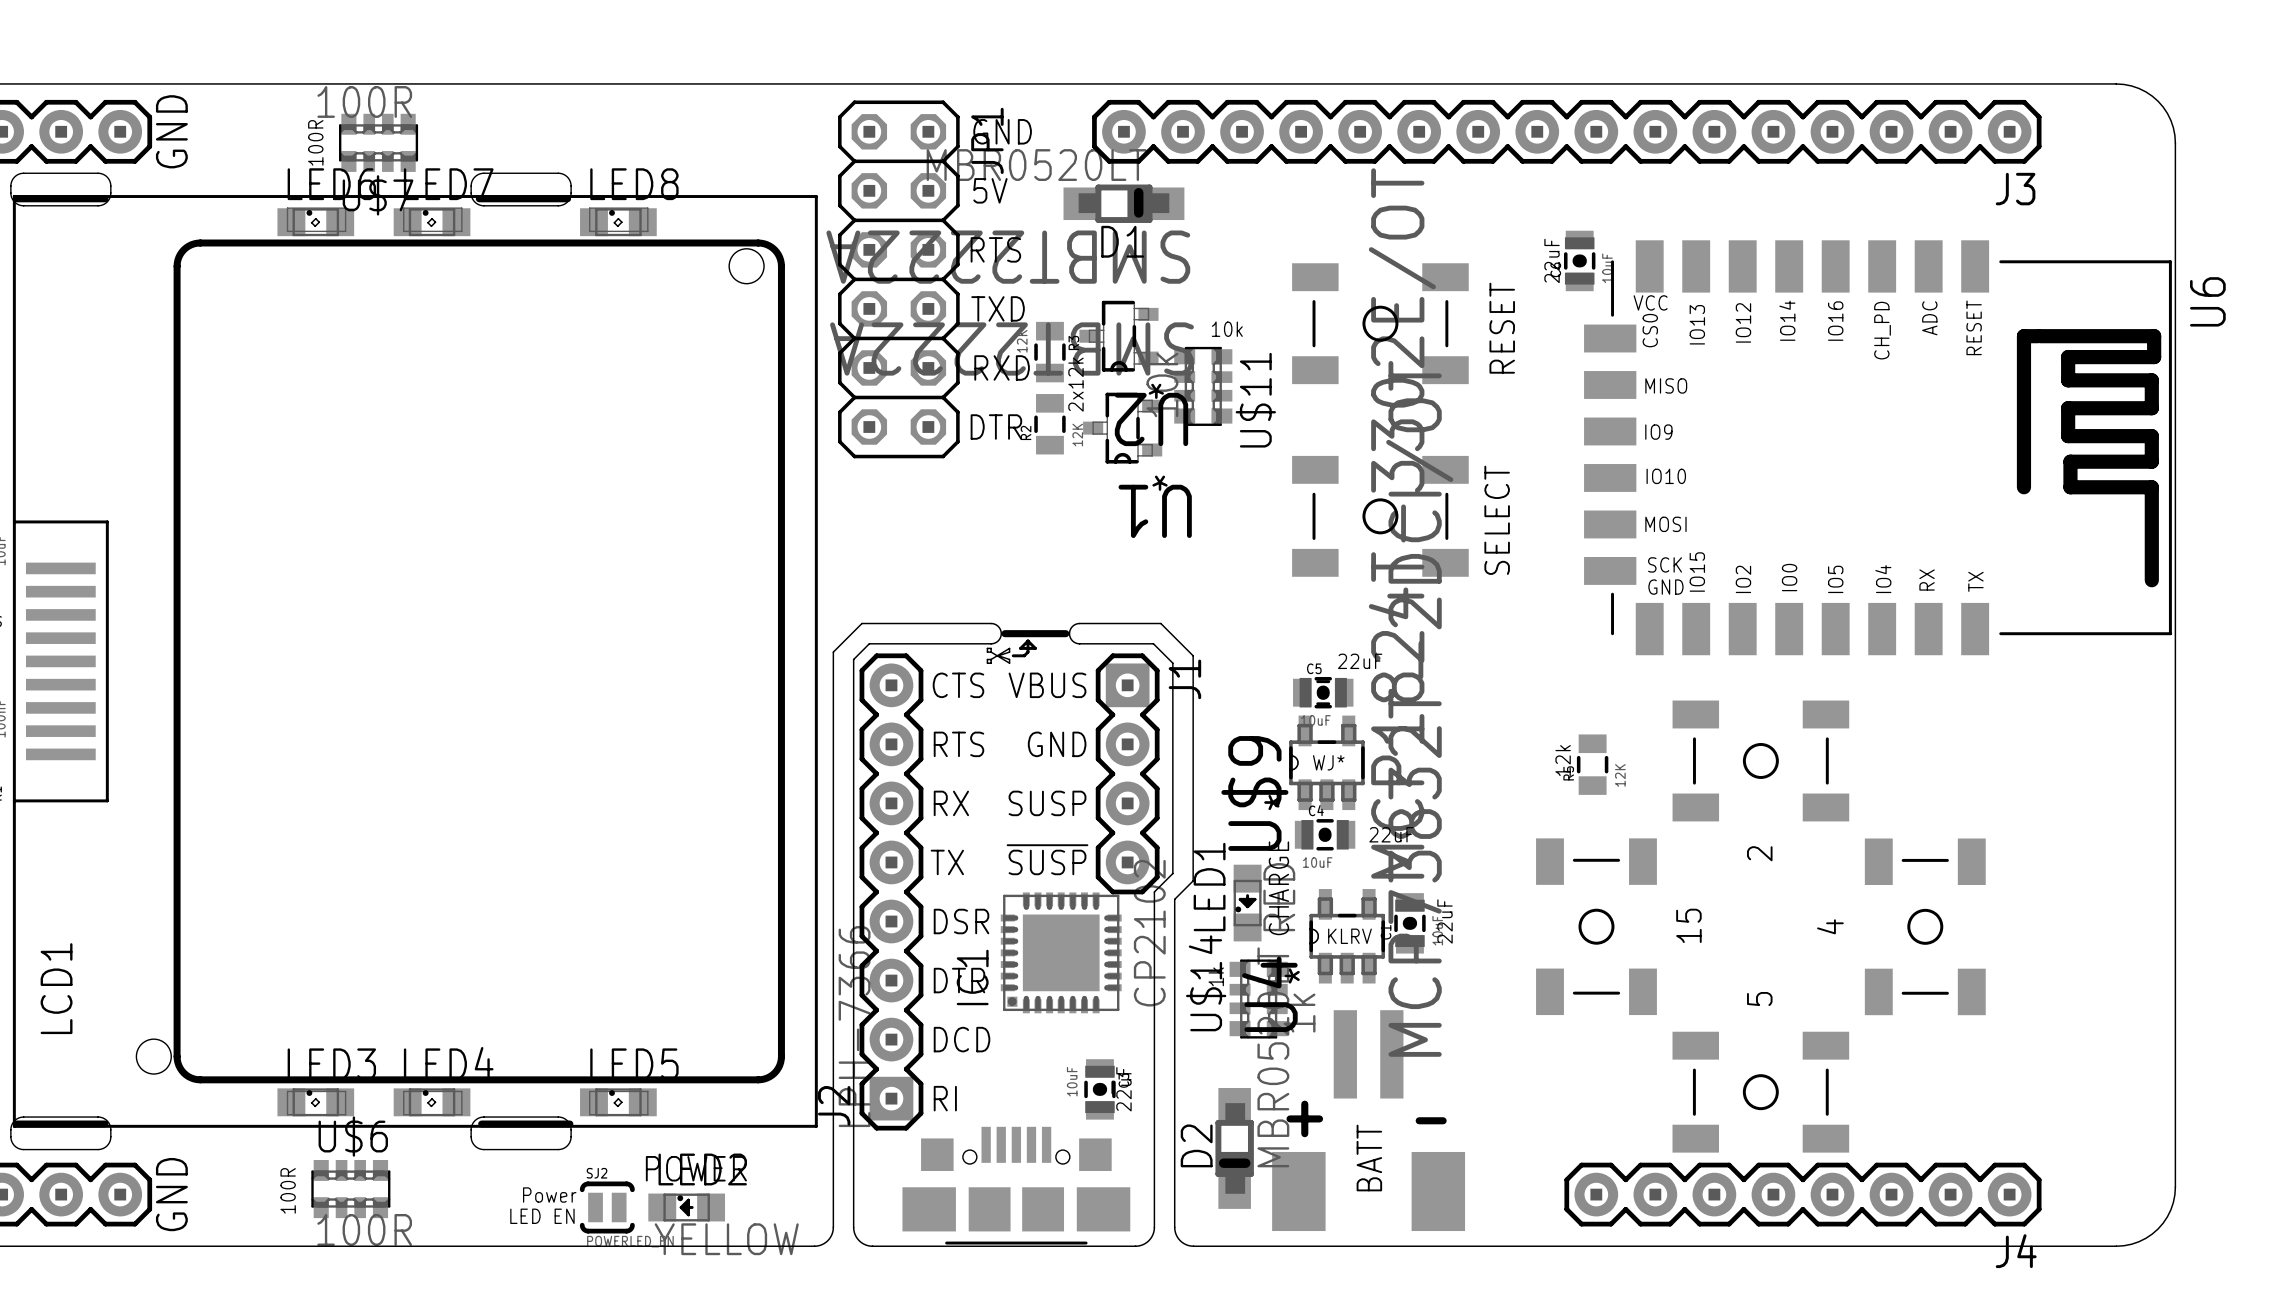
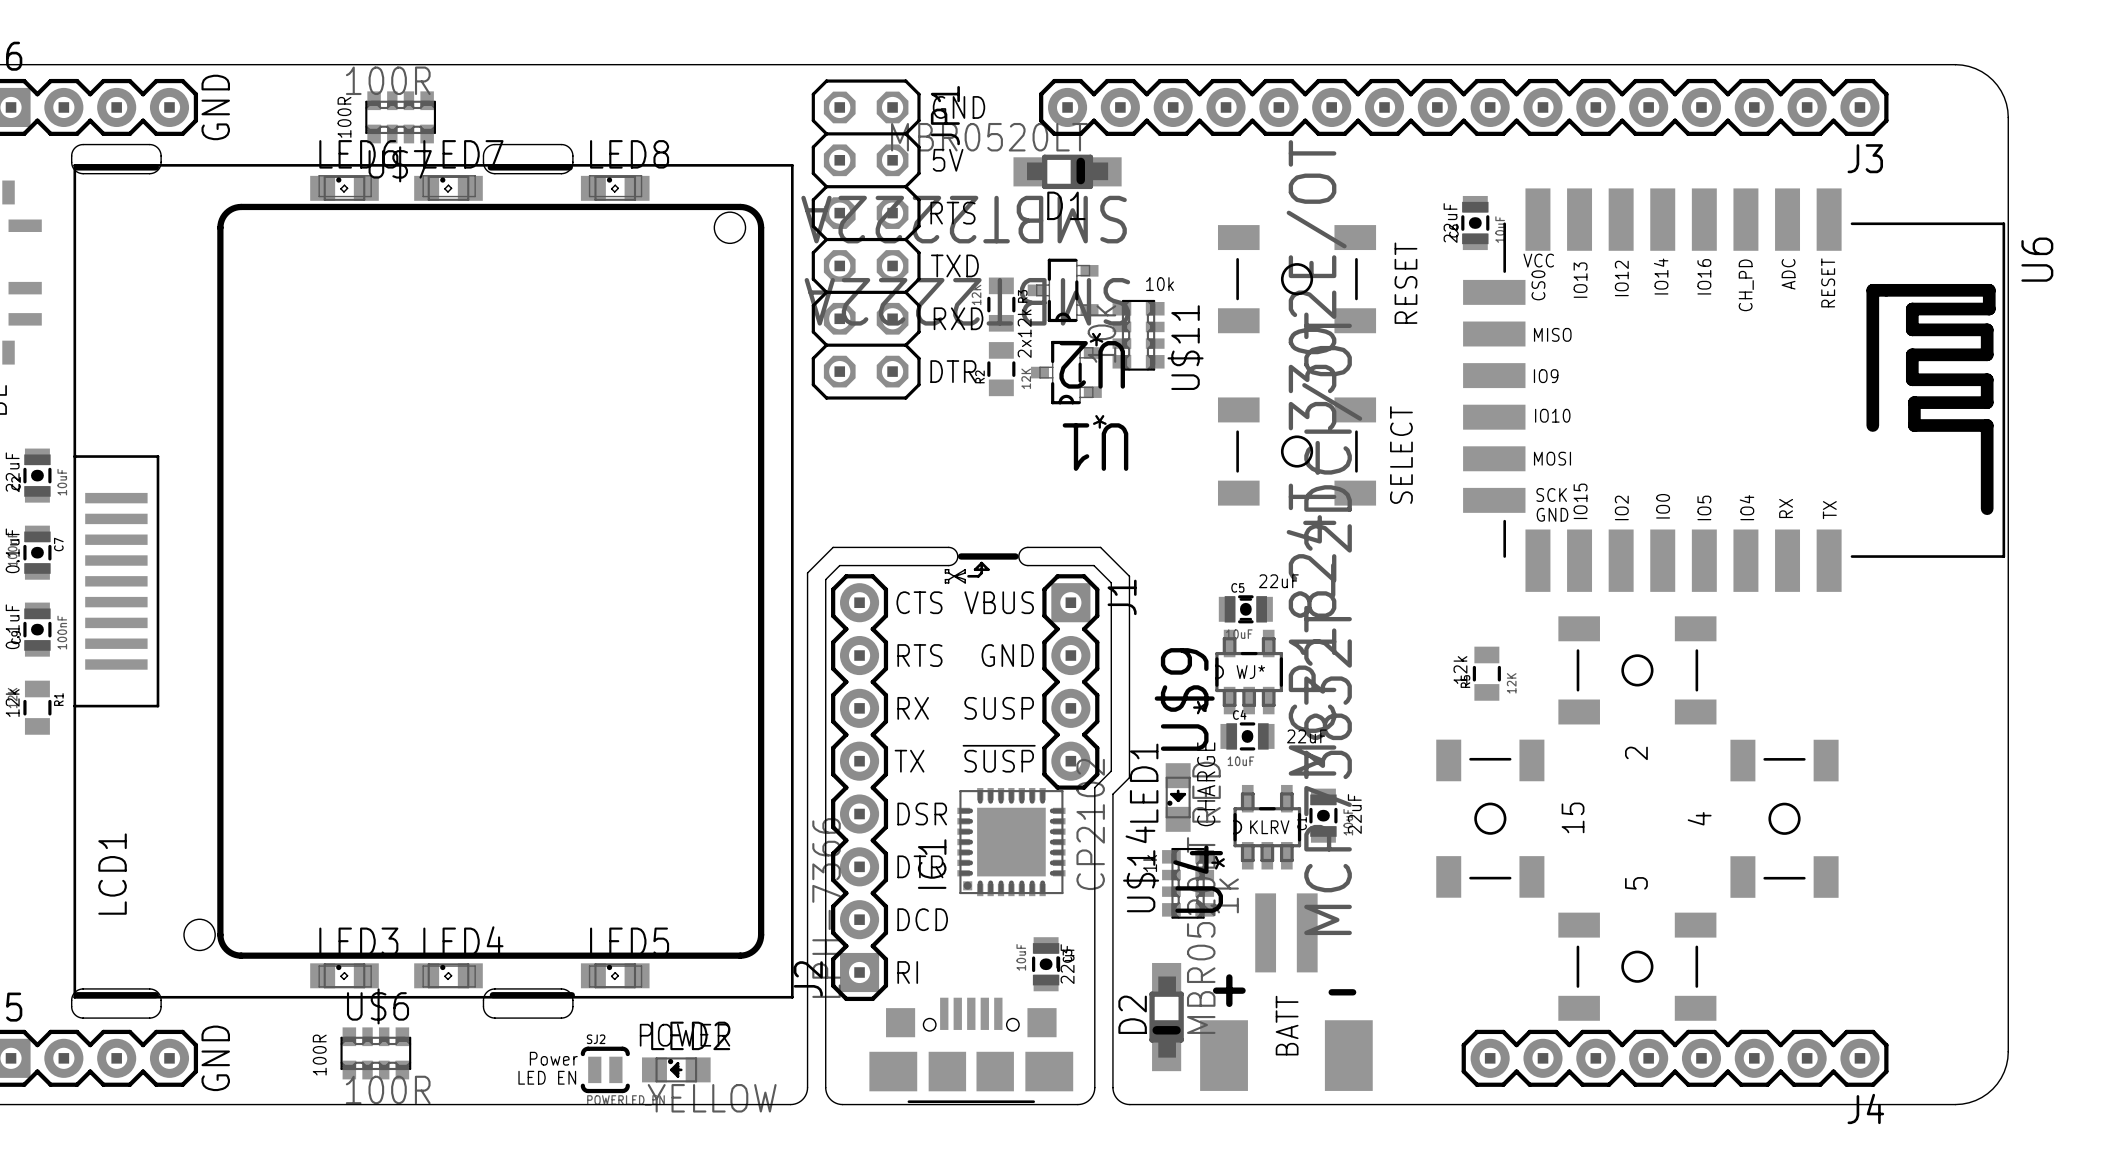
U6 footprint: [1584, 240, 2172, 656] -> [1463, 188, 2006, 592]

